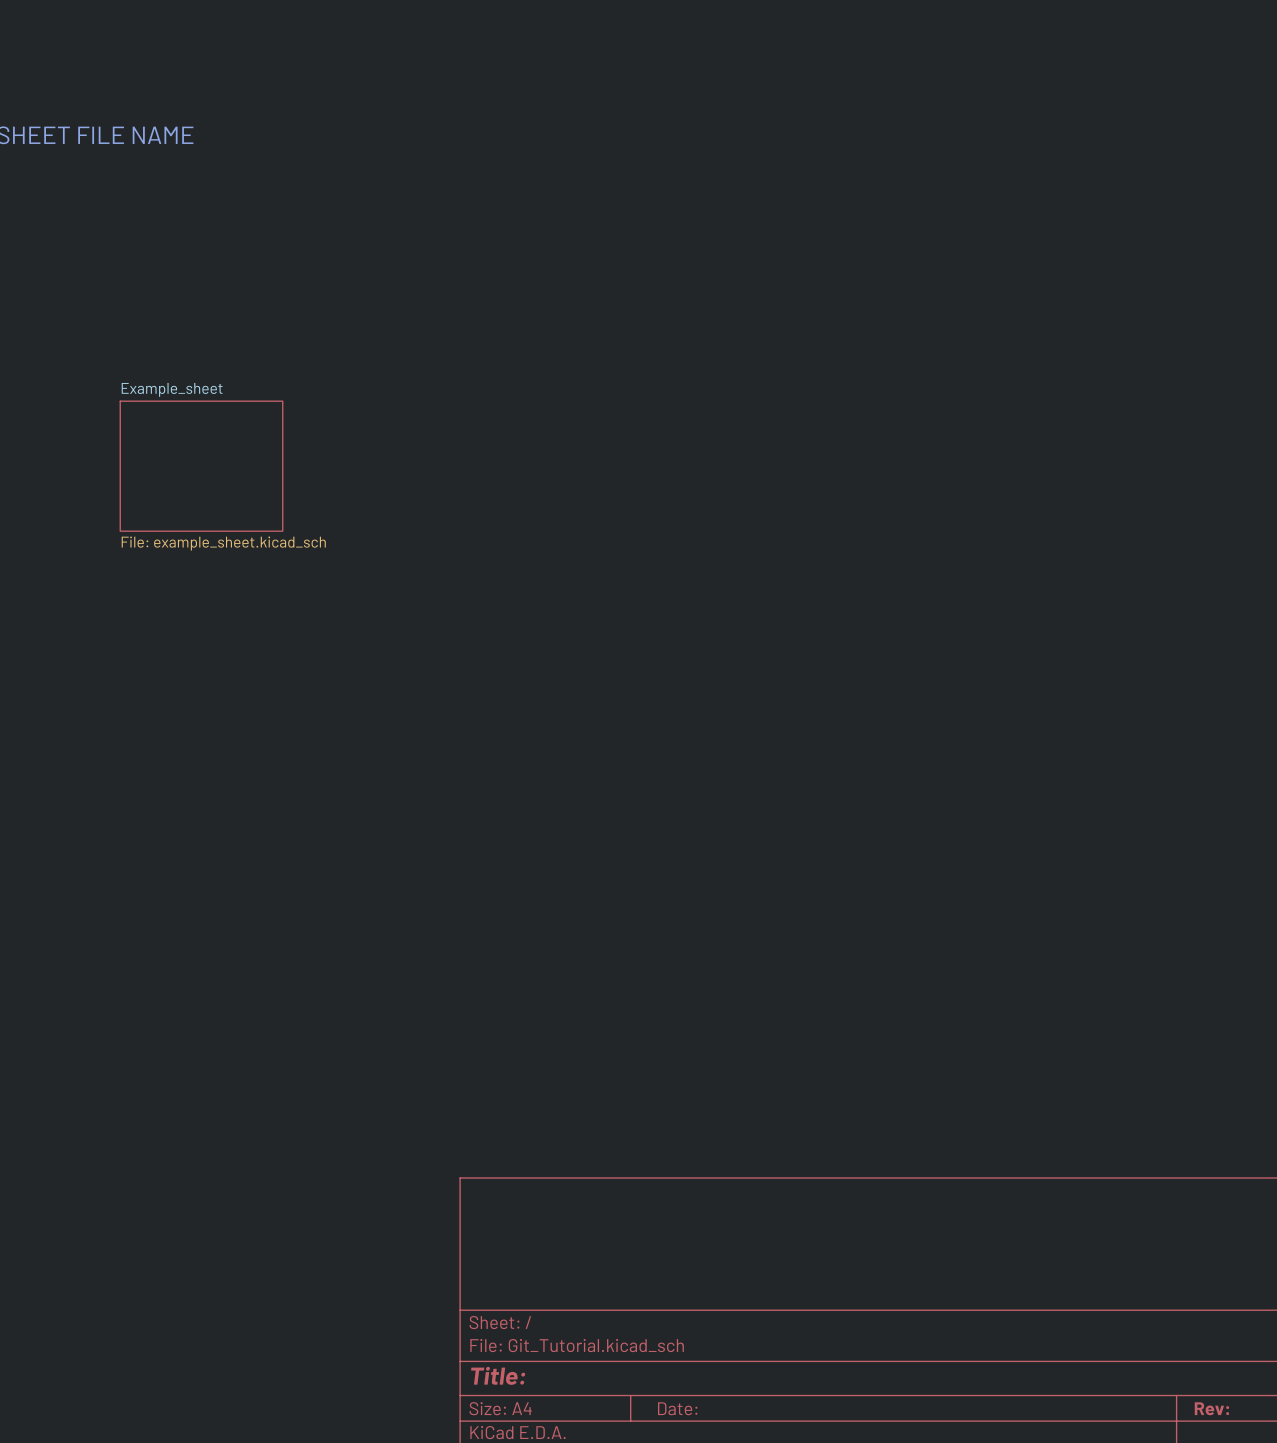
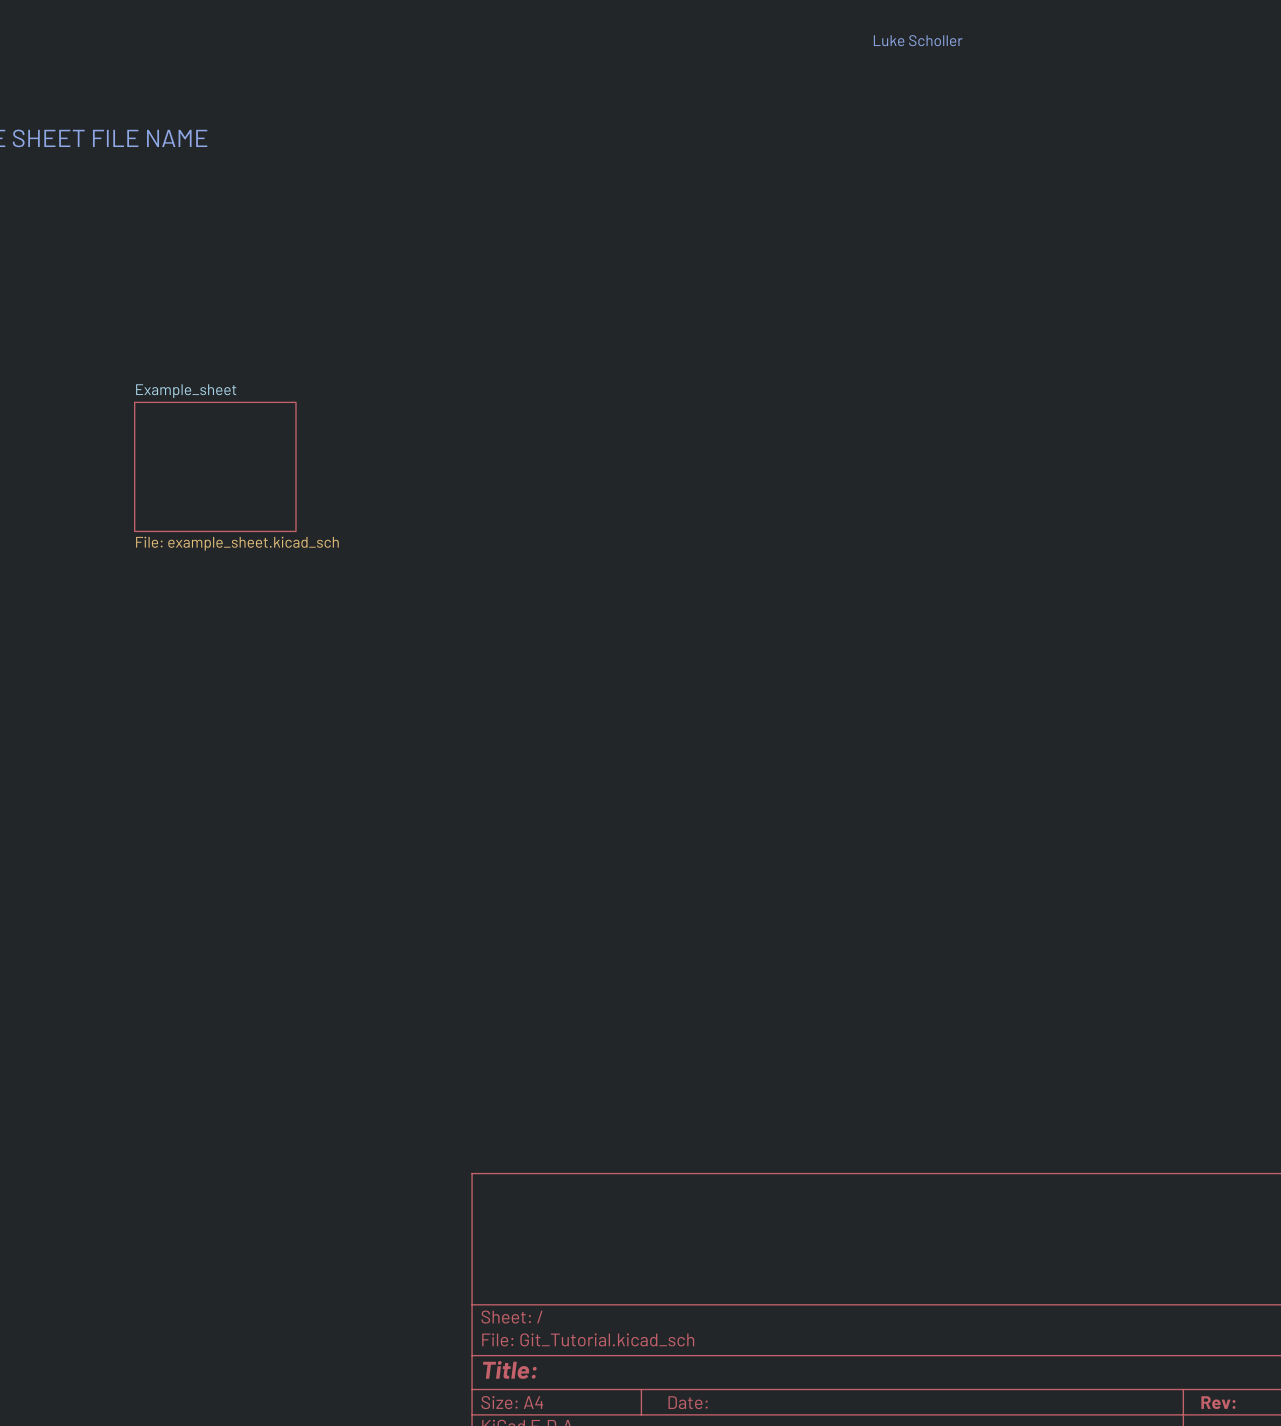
text: none -> Luke Scholler (918, 40)

